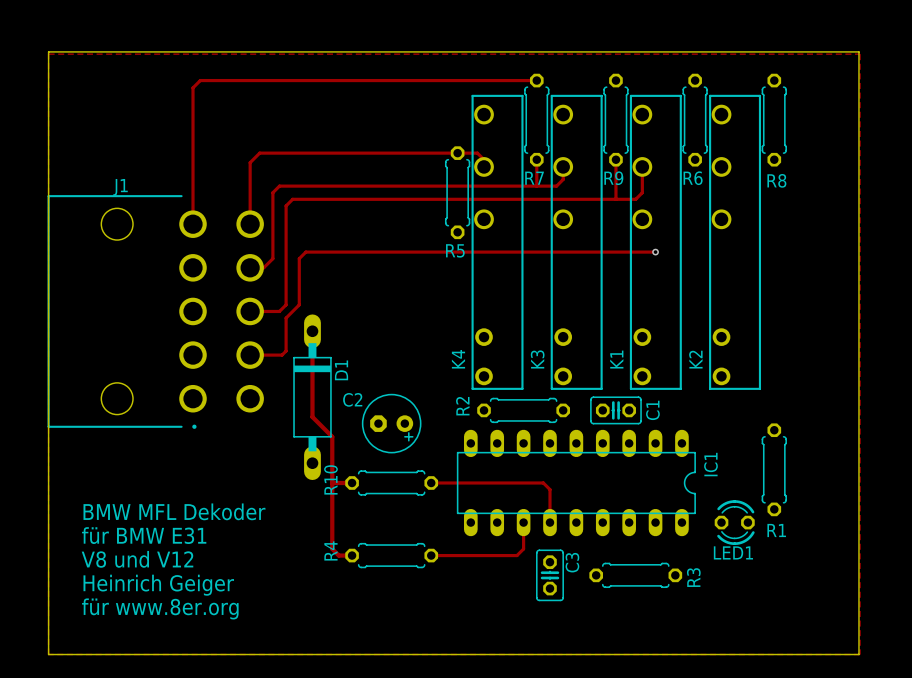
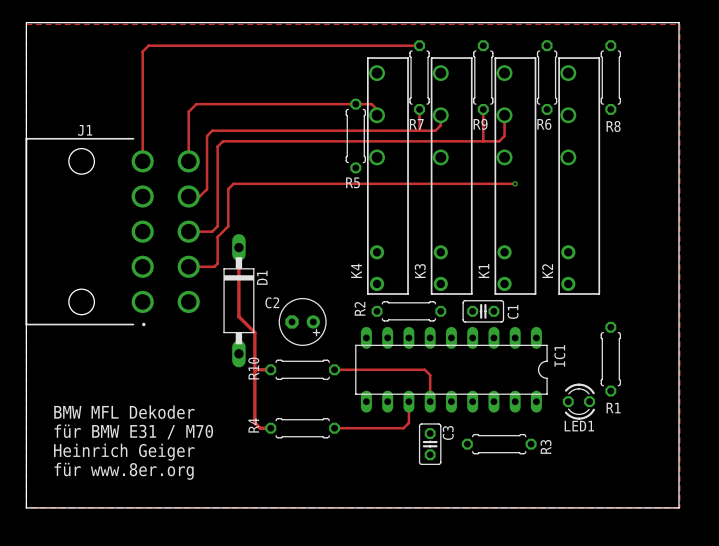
text: BMW MFL Dekoder (174, 511) -> none
text: für BMW E31 (144, 535) -> BMW MFL Dekoder (124, 412)
text: V8 und V12 (137, 559) -> für BMW E31 / M70 (133, 431)

